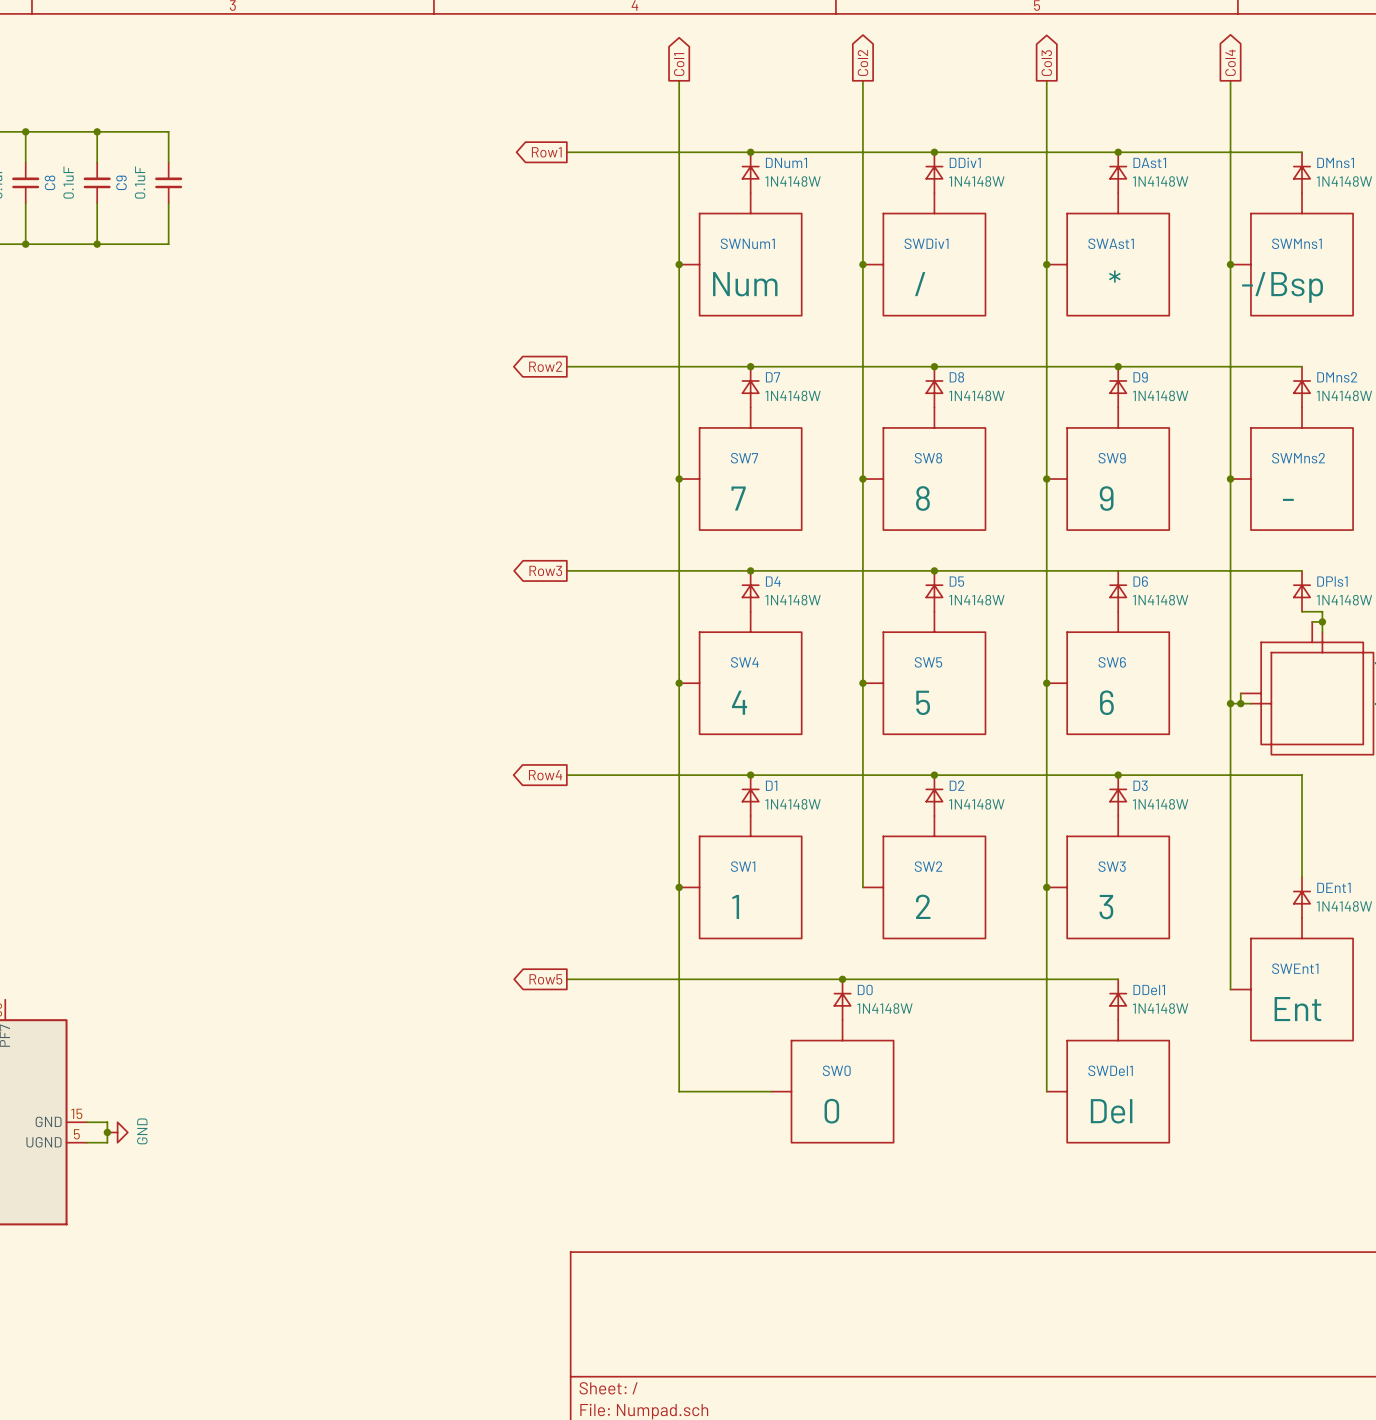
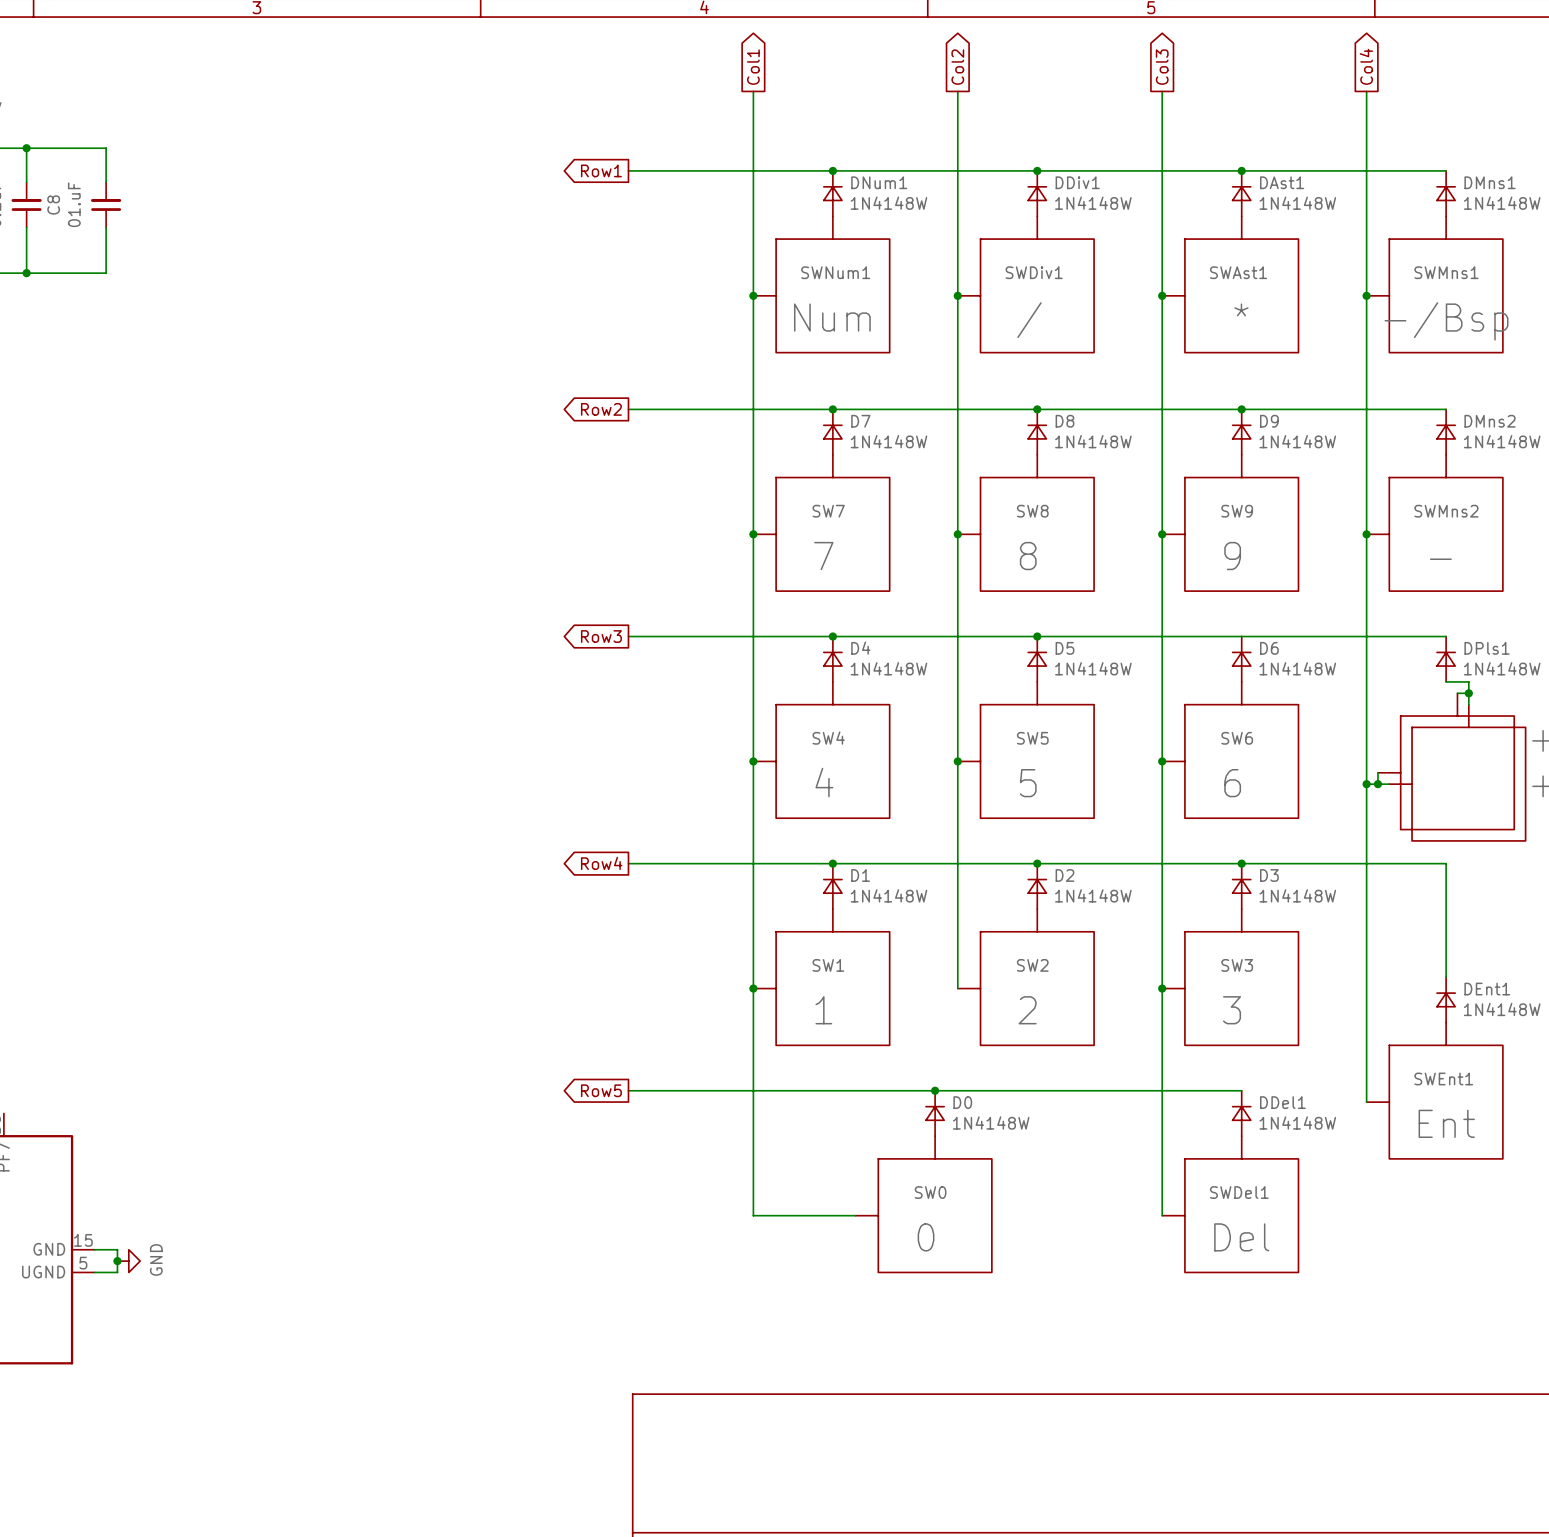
wire: (97, 131) (168, 131) (168, 162) -> none
junction: (97, 131) -> none
C8 value: 0.1uF (68, 182) -> 01.uF (74, 204)
C9: 0.1uF (168, 182) -> none
wire: (168, 203) (168, 244) (97, 244) -> none
junction: (97, 244) -> none

